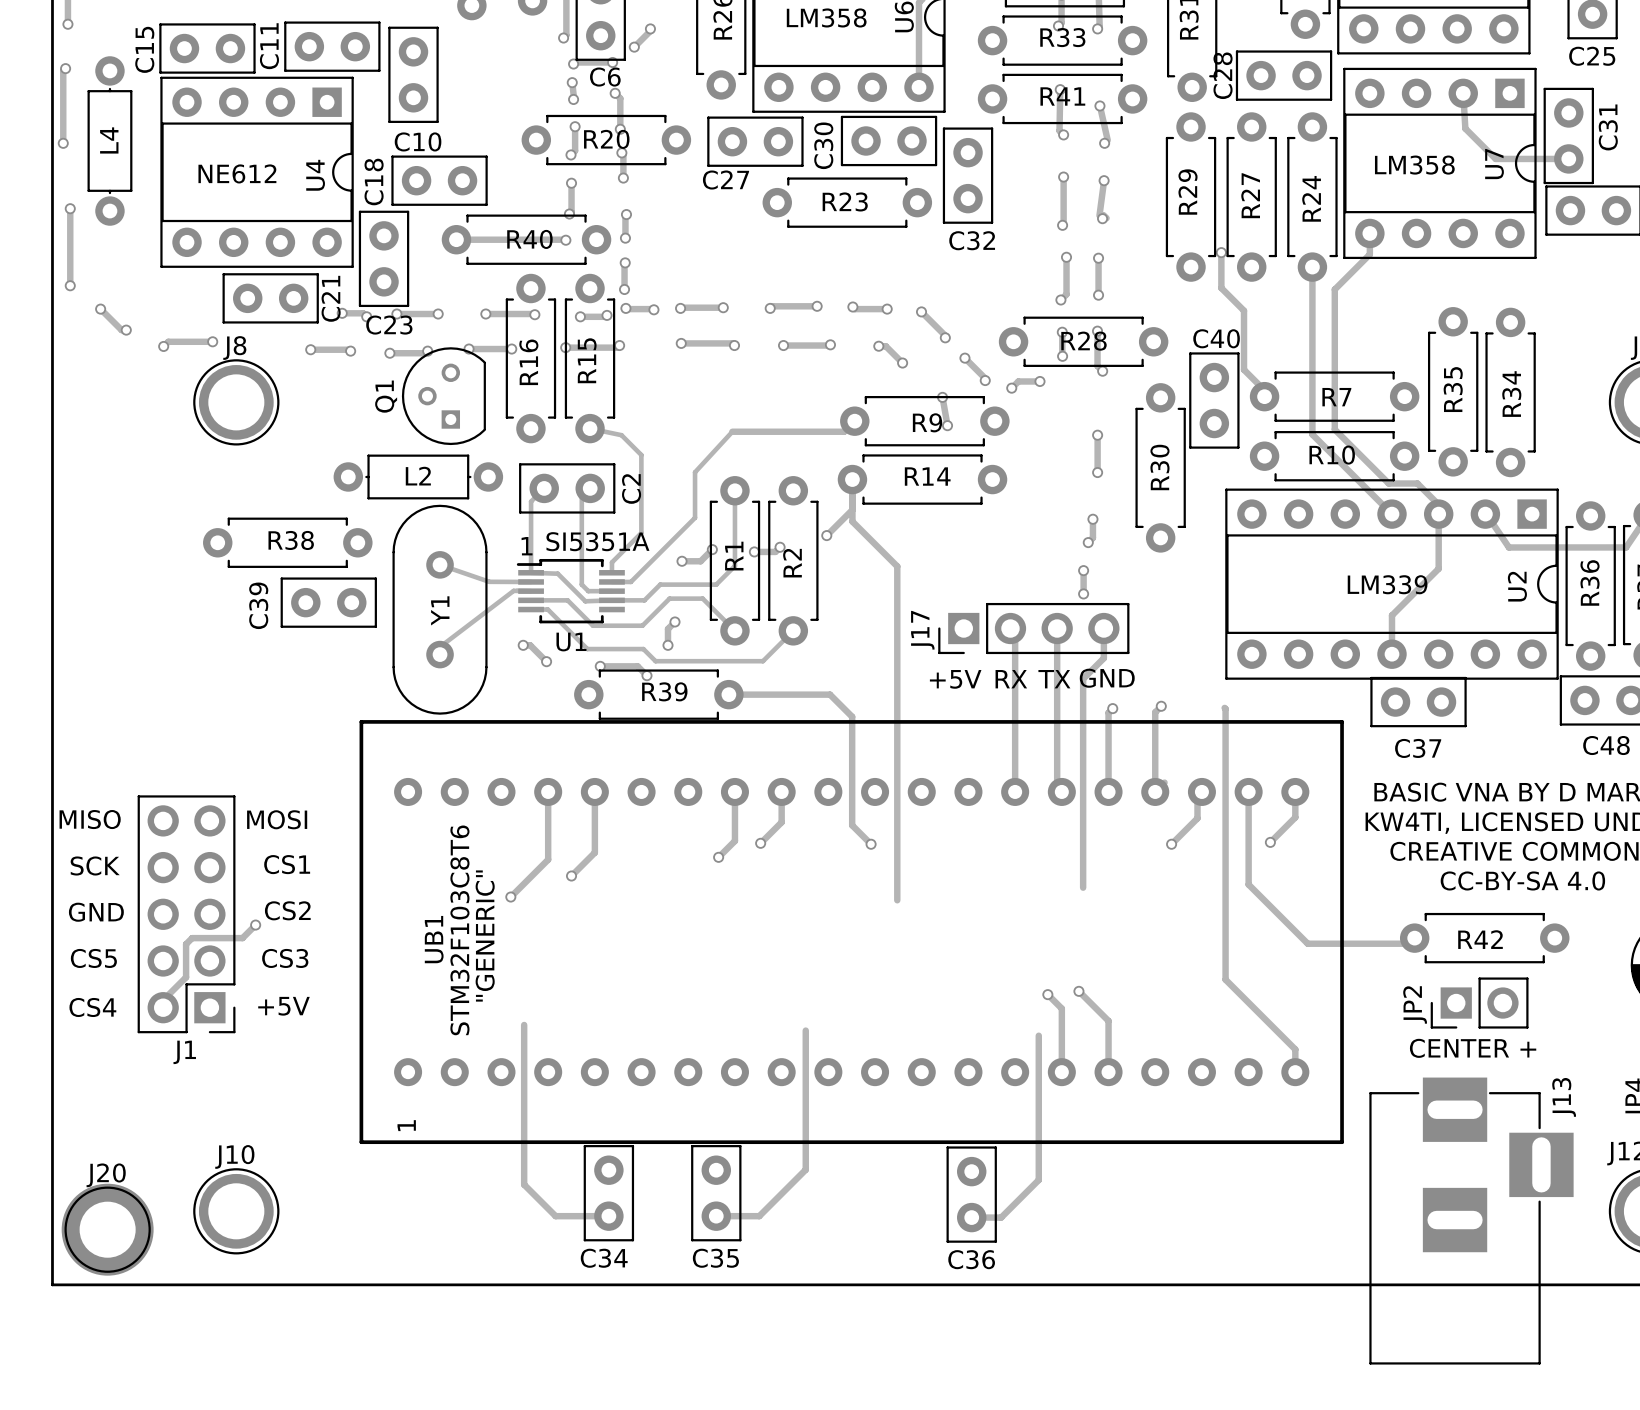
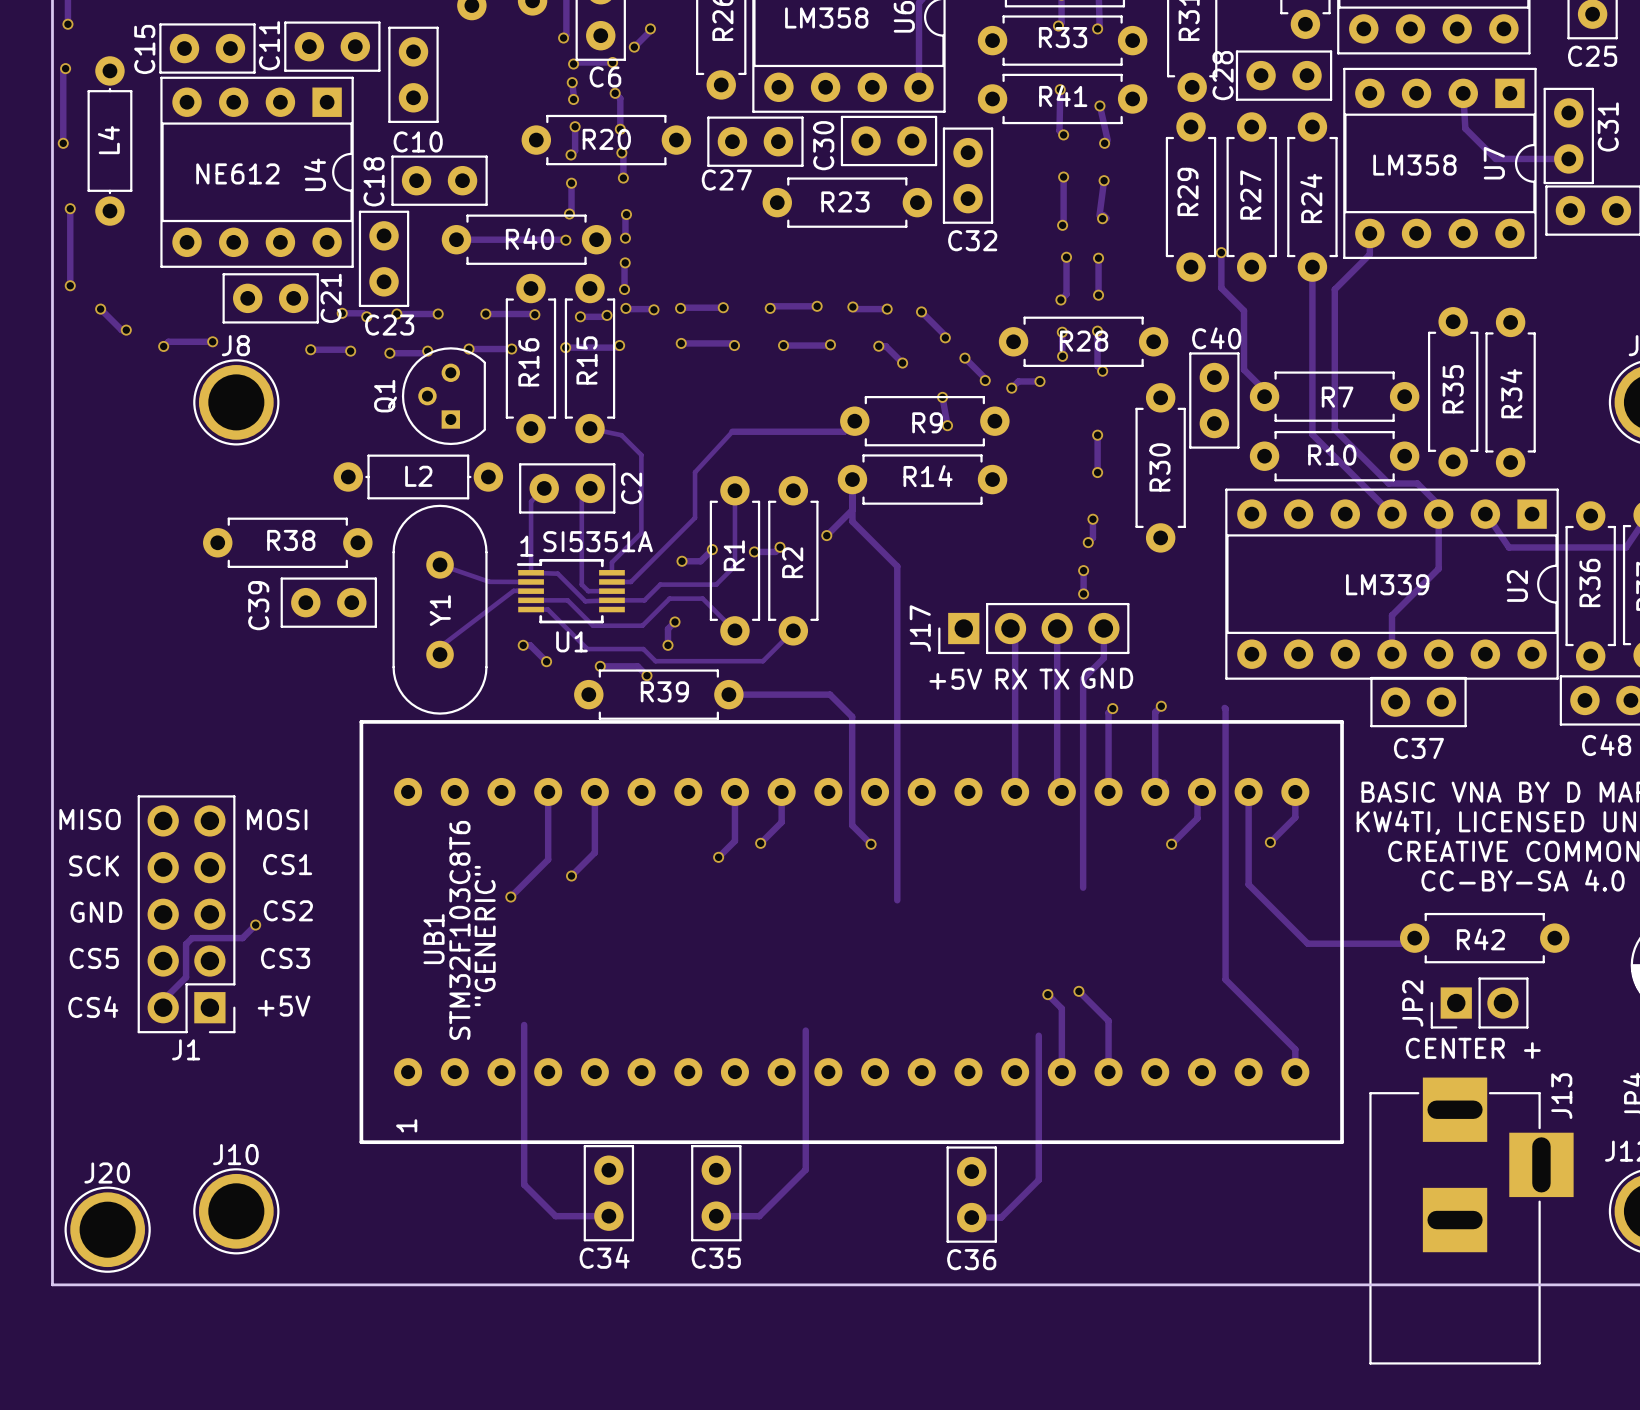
J20 footprint: [61, 1183, 154, 1276] -> [64, 1186, 151, 1273]

